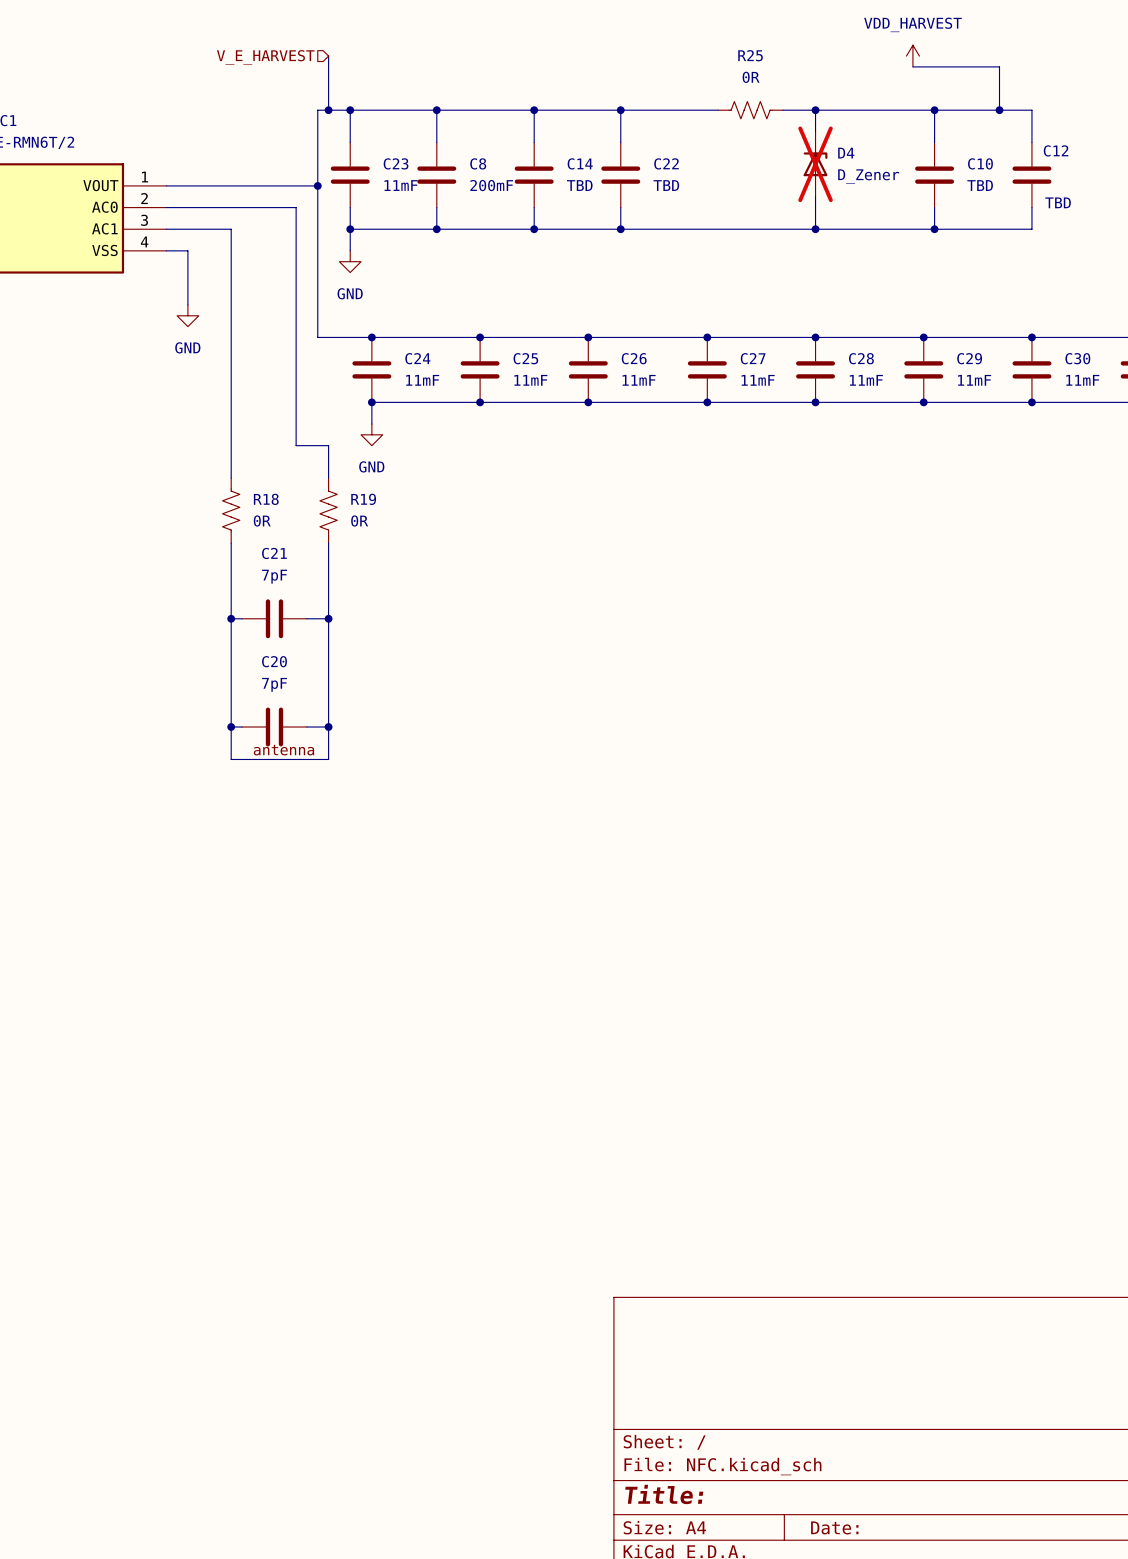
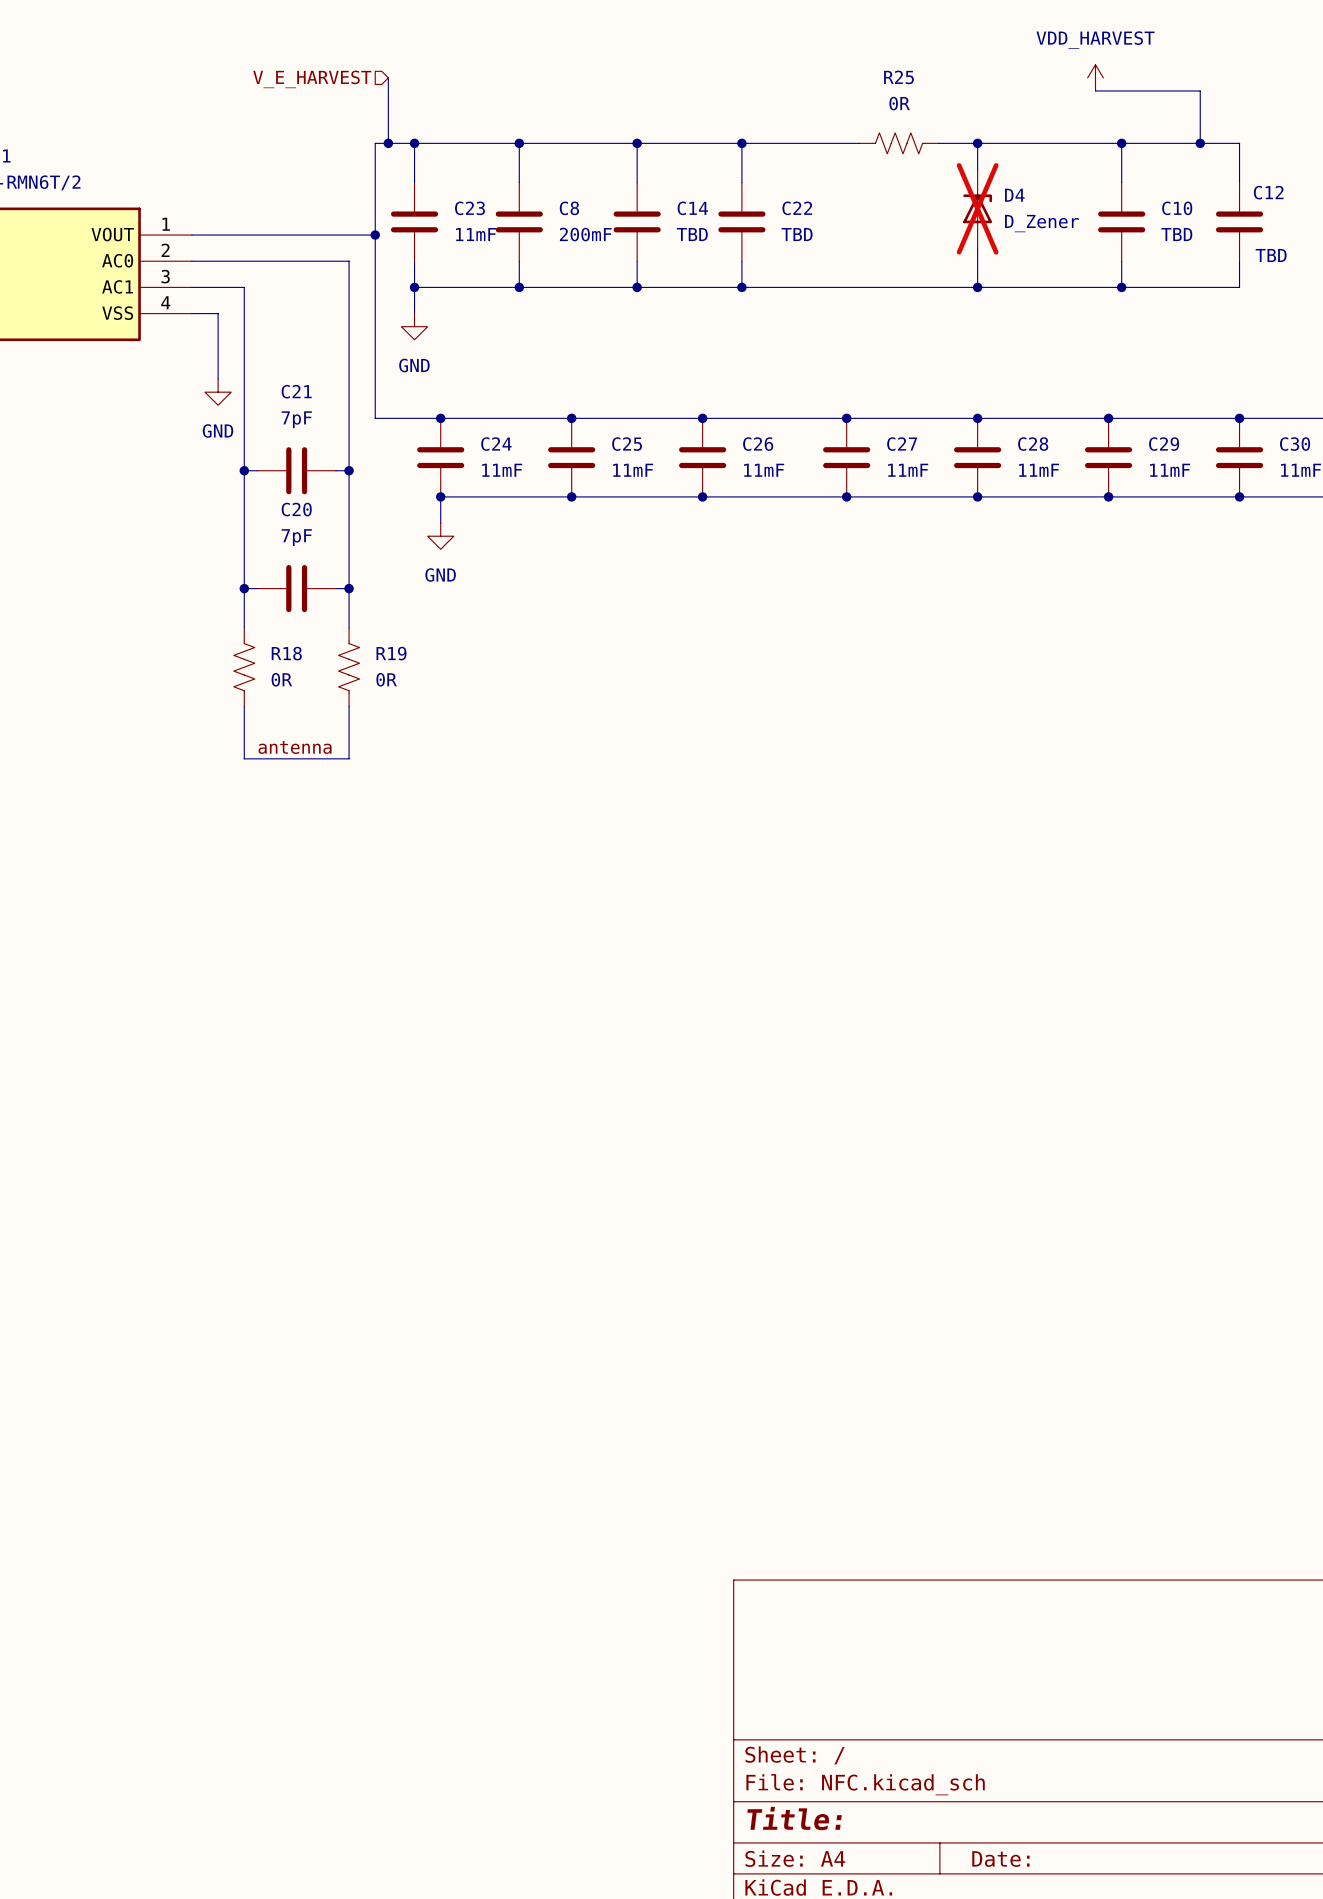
wire: (209, 229) (231, 229) (231, 478) -> (244, 287) (244, 627)
wire: none -> (244, 470) (257, 470)
junction: none -> (244, 470)
wire: none -> (335, 470) (349, 470)
junction: none -> (349, 470)
wire: (296, 445) (328, 445) (328, 478) -> (349, 549) (349, 627)
wire: none -> (244, 588) (257, 588)
junction: none -> (244, 588)
wire: none -> (335, 588) (349, 588)
junction: none -> (349, 588)
R18 position: (231, 510) -> (244, 667)
R19 position: (328, 510) -> (349, 667)
wire: (231, 543) (231, 759) (328, 759) (328, 543) -> none
wire: none -> (244, 706) (244, 758) (270, 758)
wire: none -> (349, 706) (349, 758) (283, 758)
junction: (231, 618) -> none
C21 position: (274, 618) -> (296, 470)
wire: (306, 618) (328, 618) -> none
junction: (328, 618) -> none
wire: (231, 727) (242, 727) -> none
junction: (231, 727) -> none
C20 position: (274, 727) -> (296, 588)
wire: (306, 727) (328, 727) -> none
junction: (328, 727) -> none
label position: antenna (283, 750) -> antenna (295, 747)

